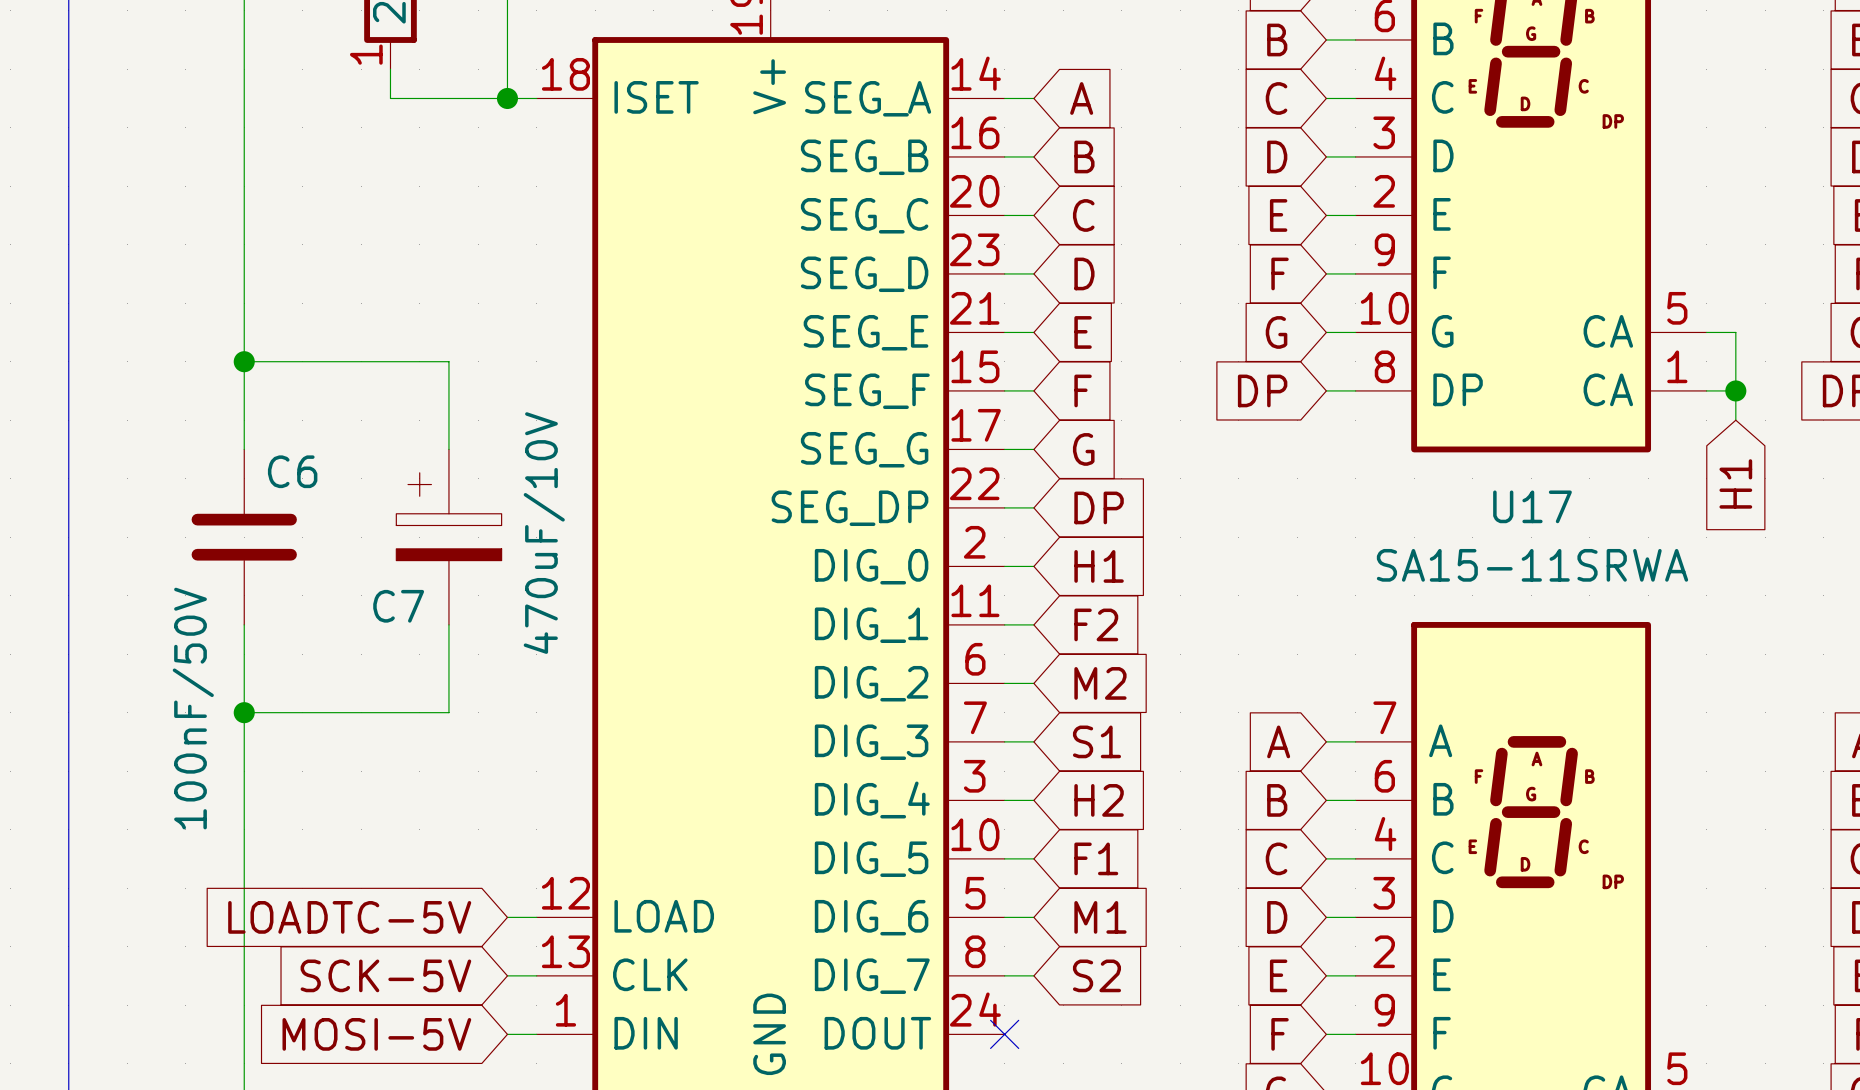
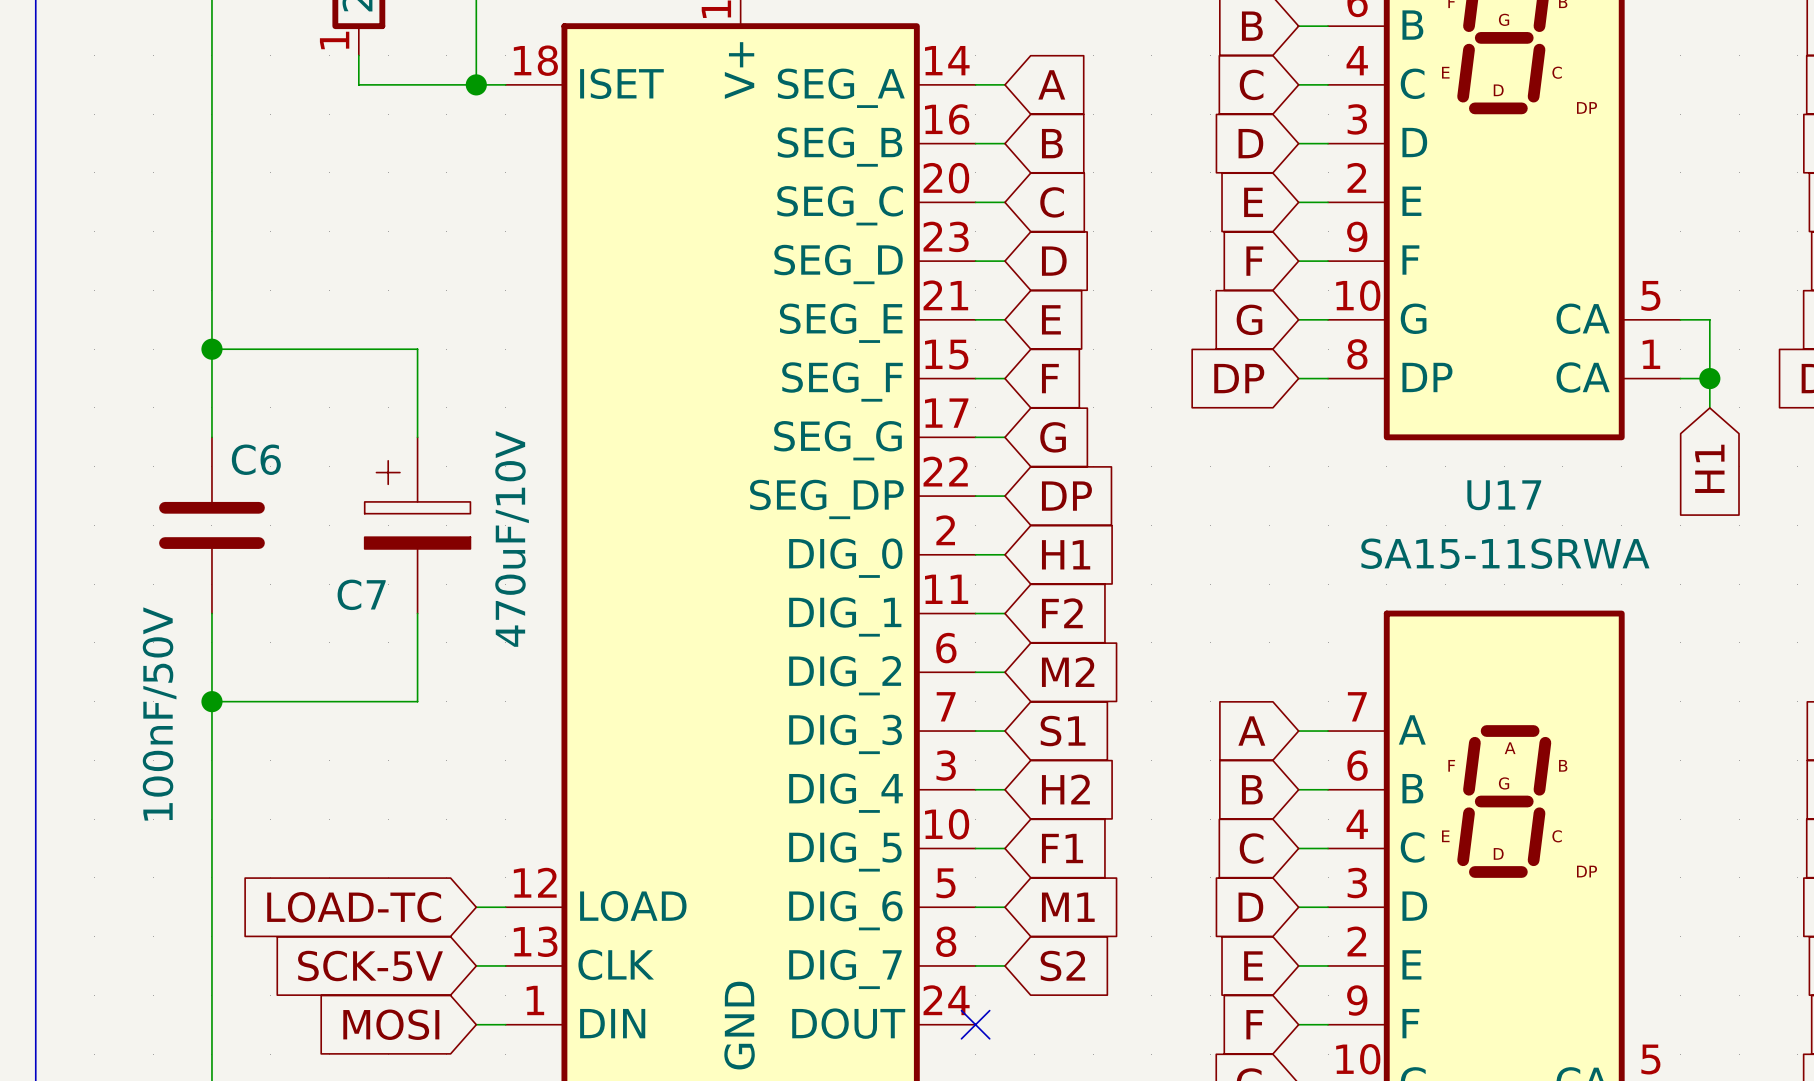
global label: LOADTC-5V (349, 917) -> LOAD-TC (354, 907)
global label: MOSI-5V (376, 1034) -> MOSI (391, 1024)

